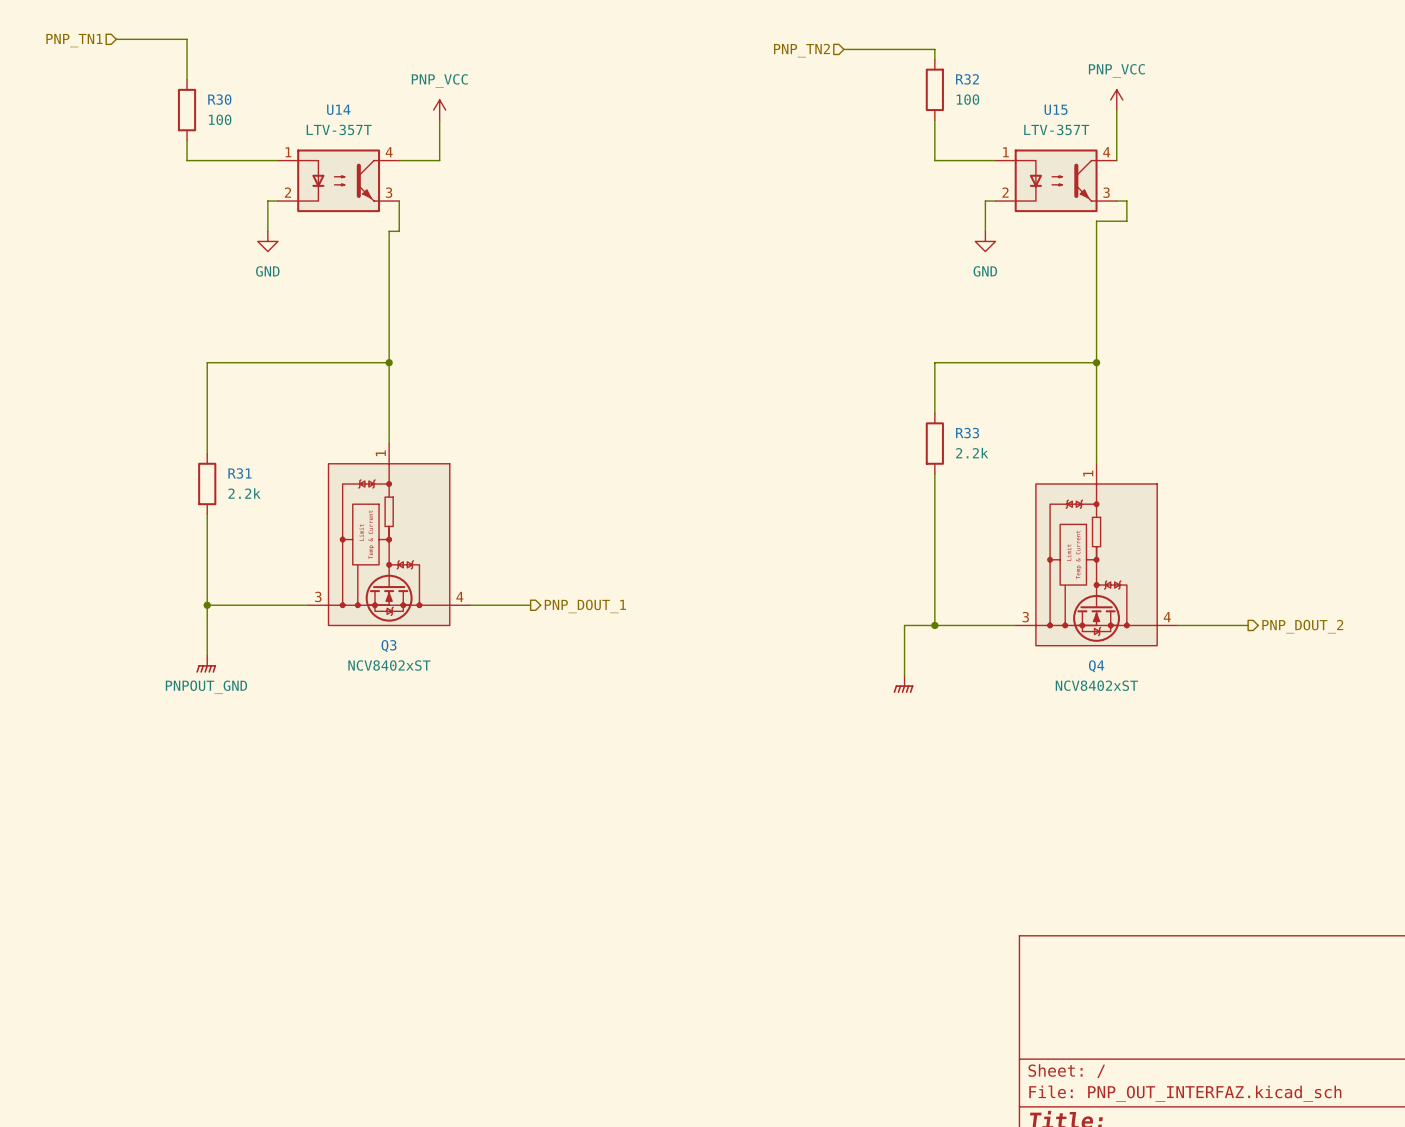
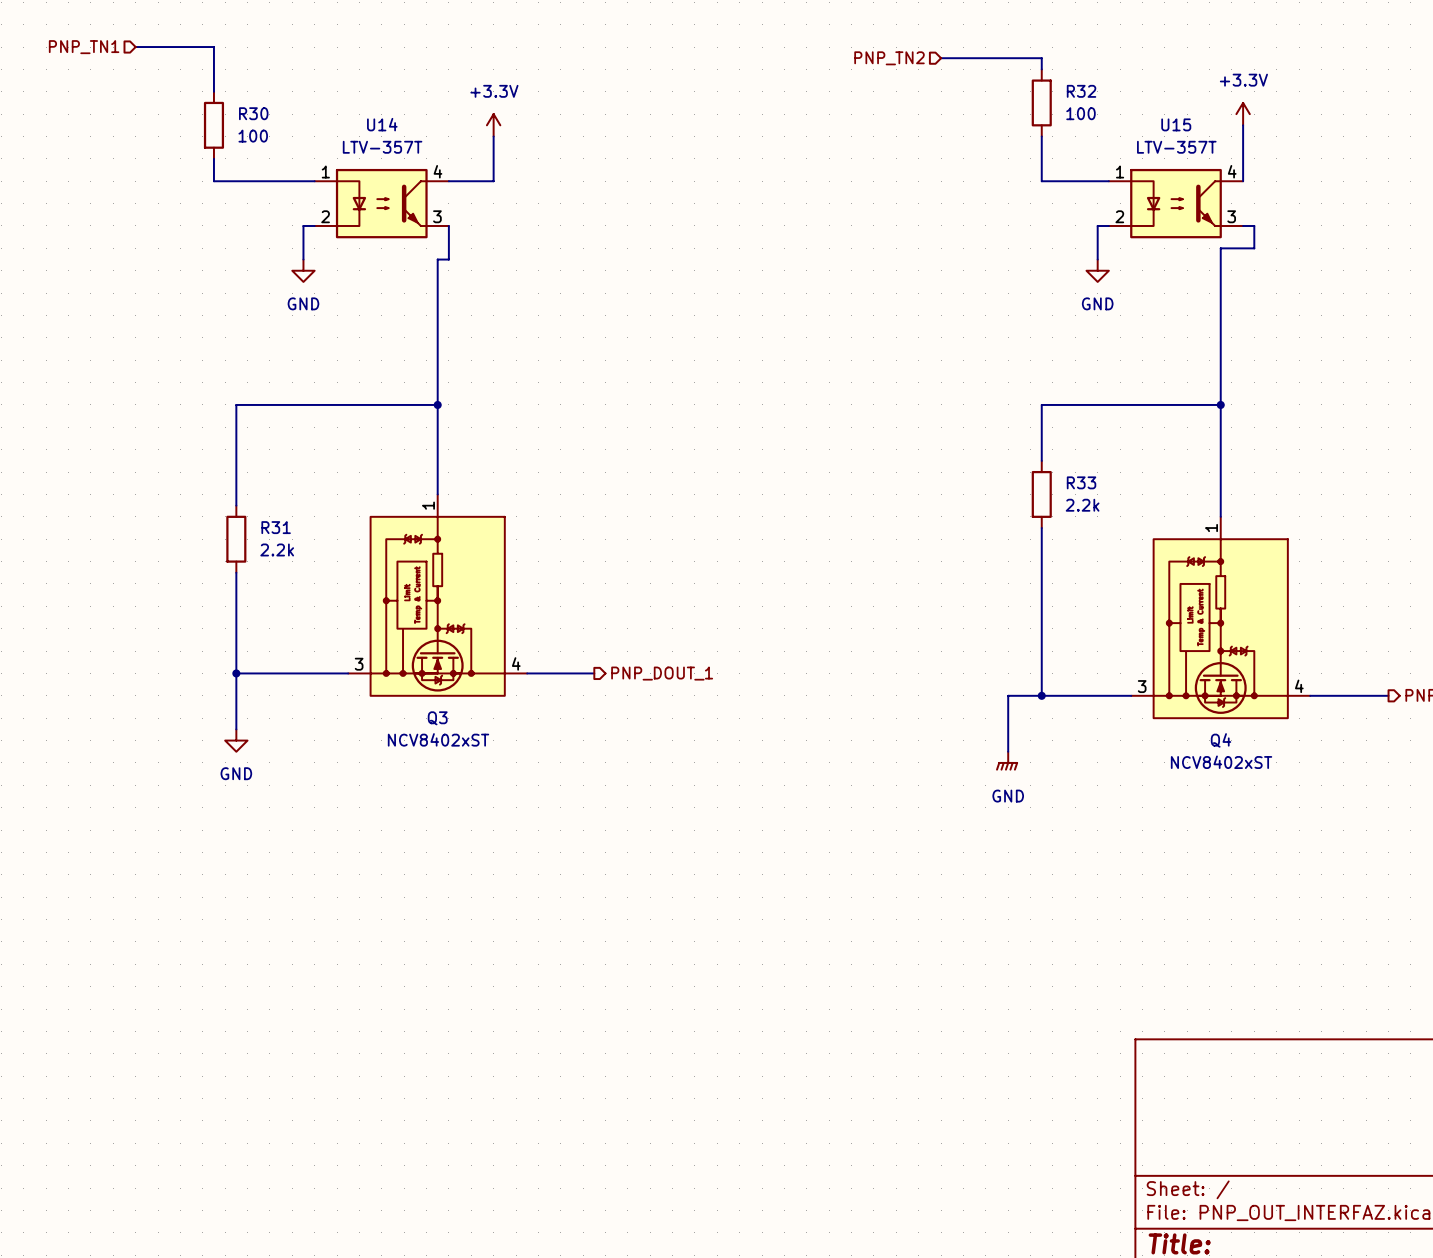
power symbol: PNP_VCC (1116, 99) -> +3.3V (1243, 114)
power symbol: PNP_VCC (439, 110) -> +3.3V (493, 125)
power symbol: PNPOUT_GND (206, 664) -> GND (236, 740)
power symbol text: none -> GND (1008, 796)

